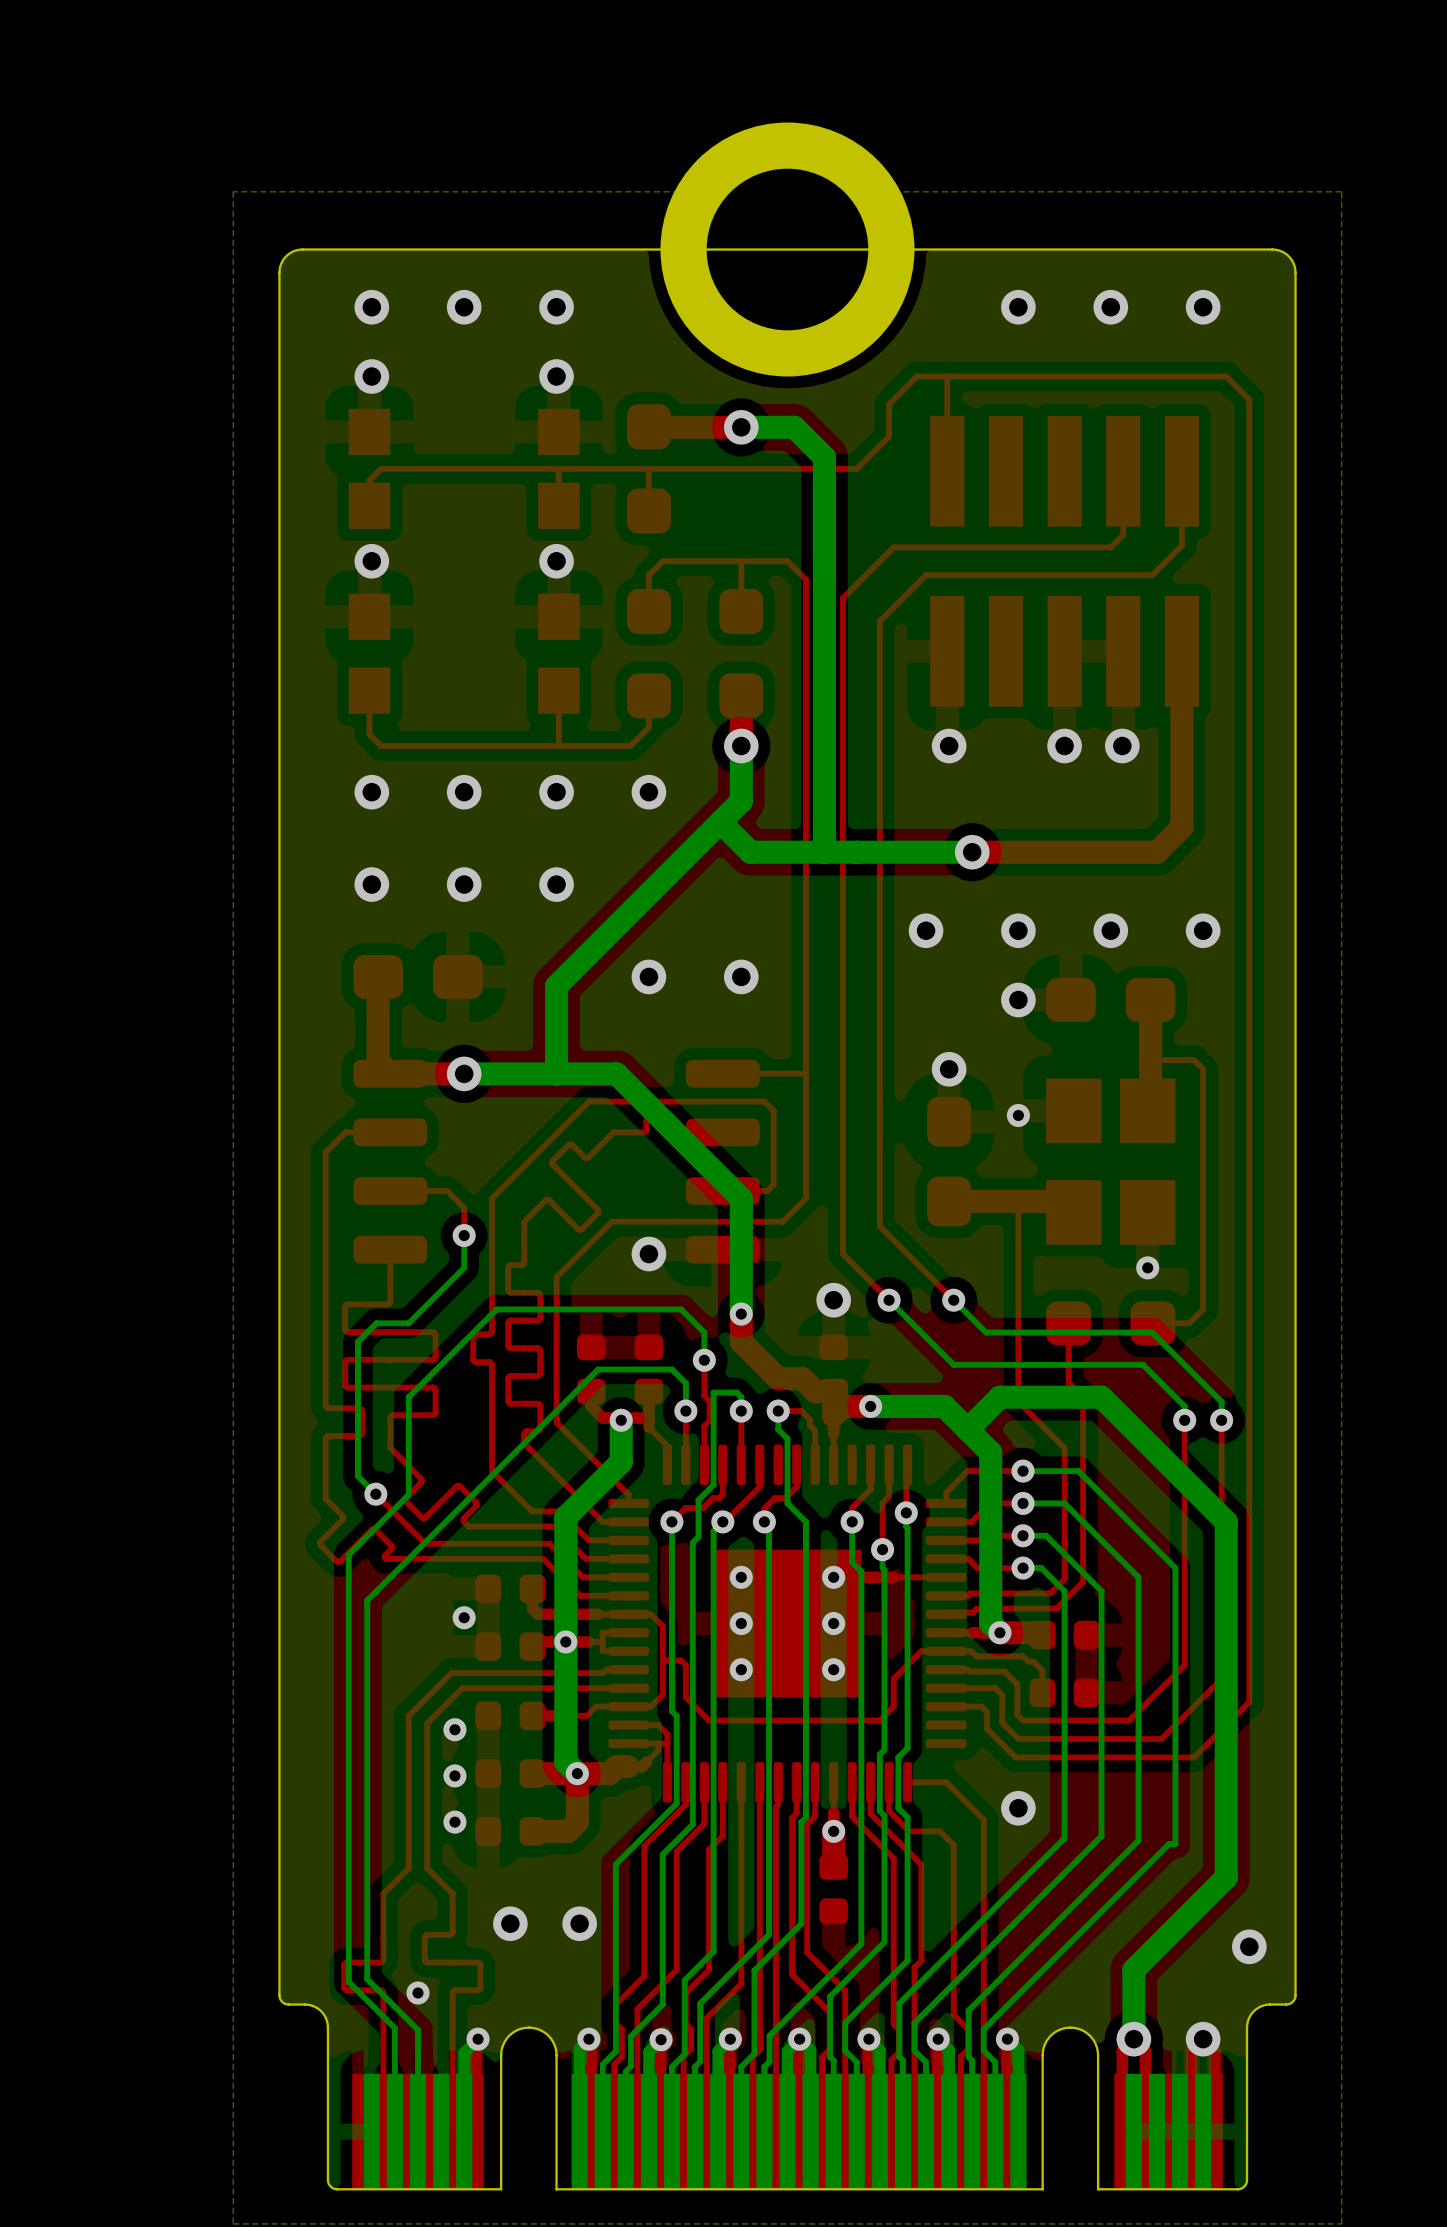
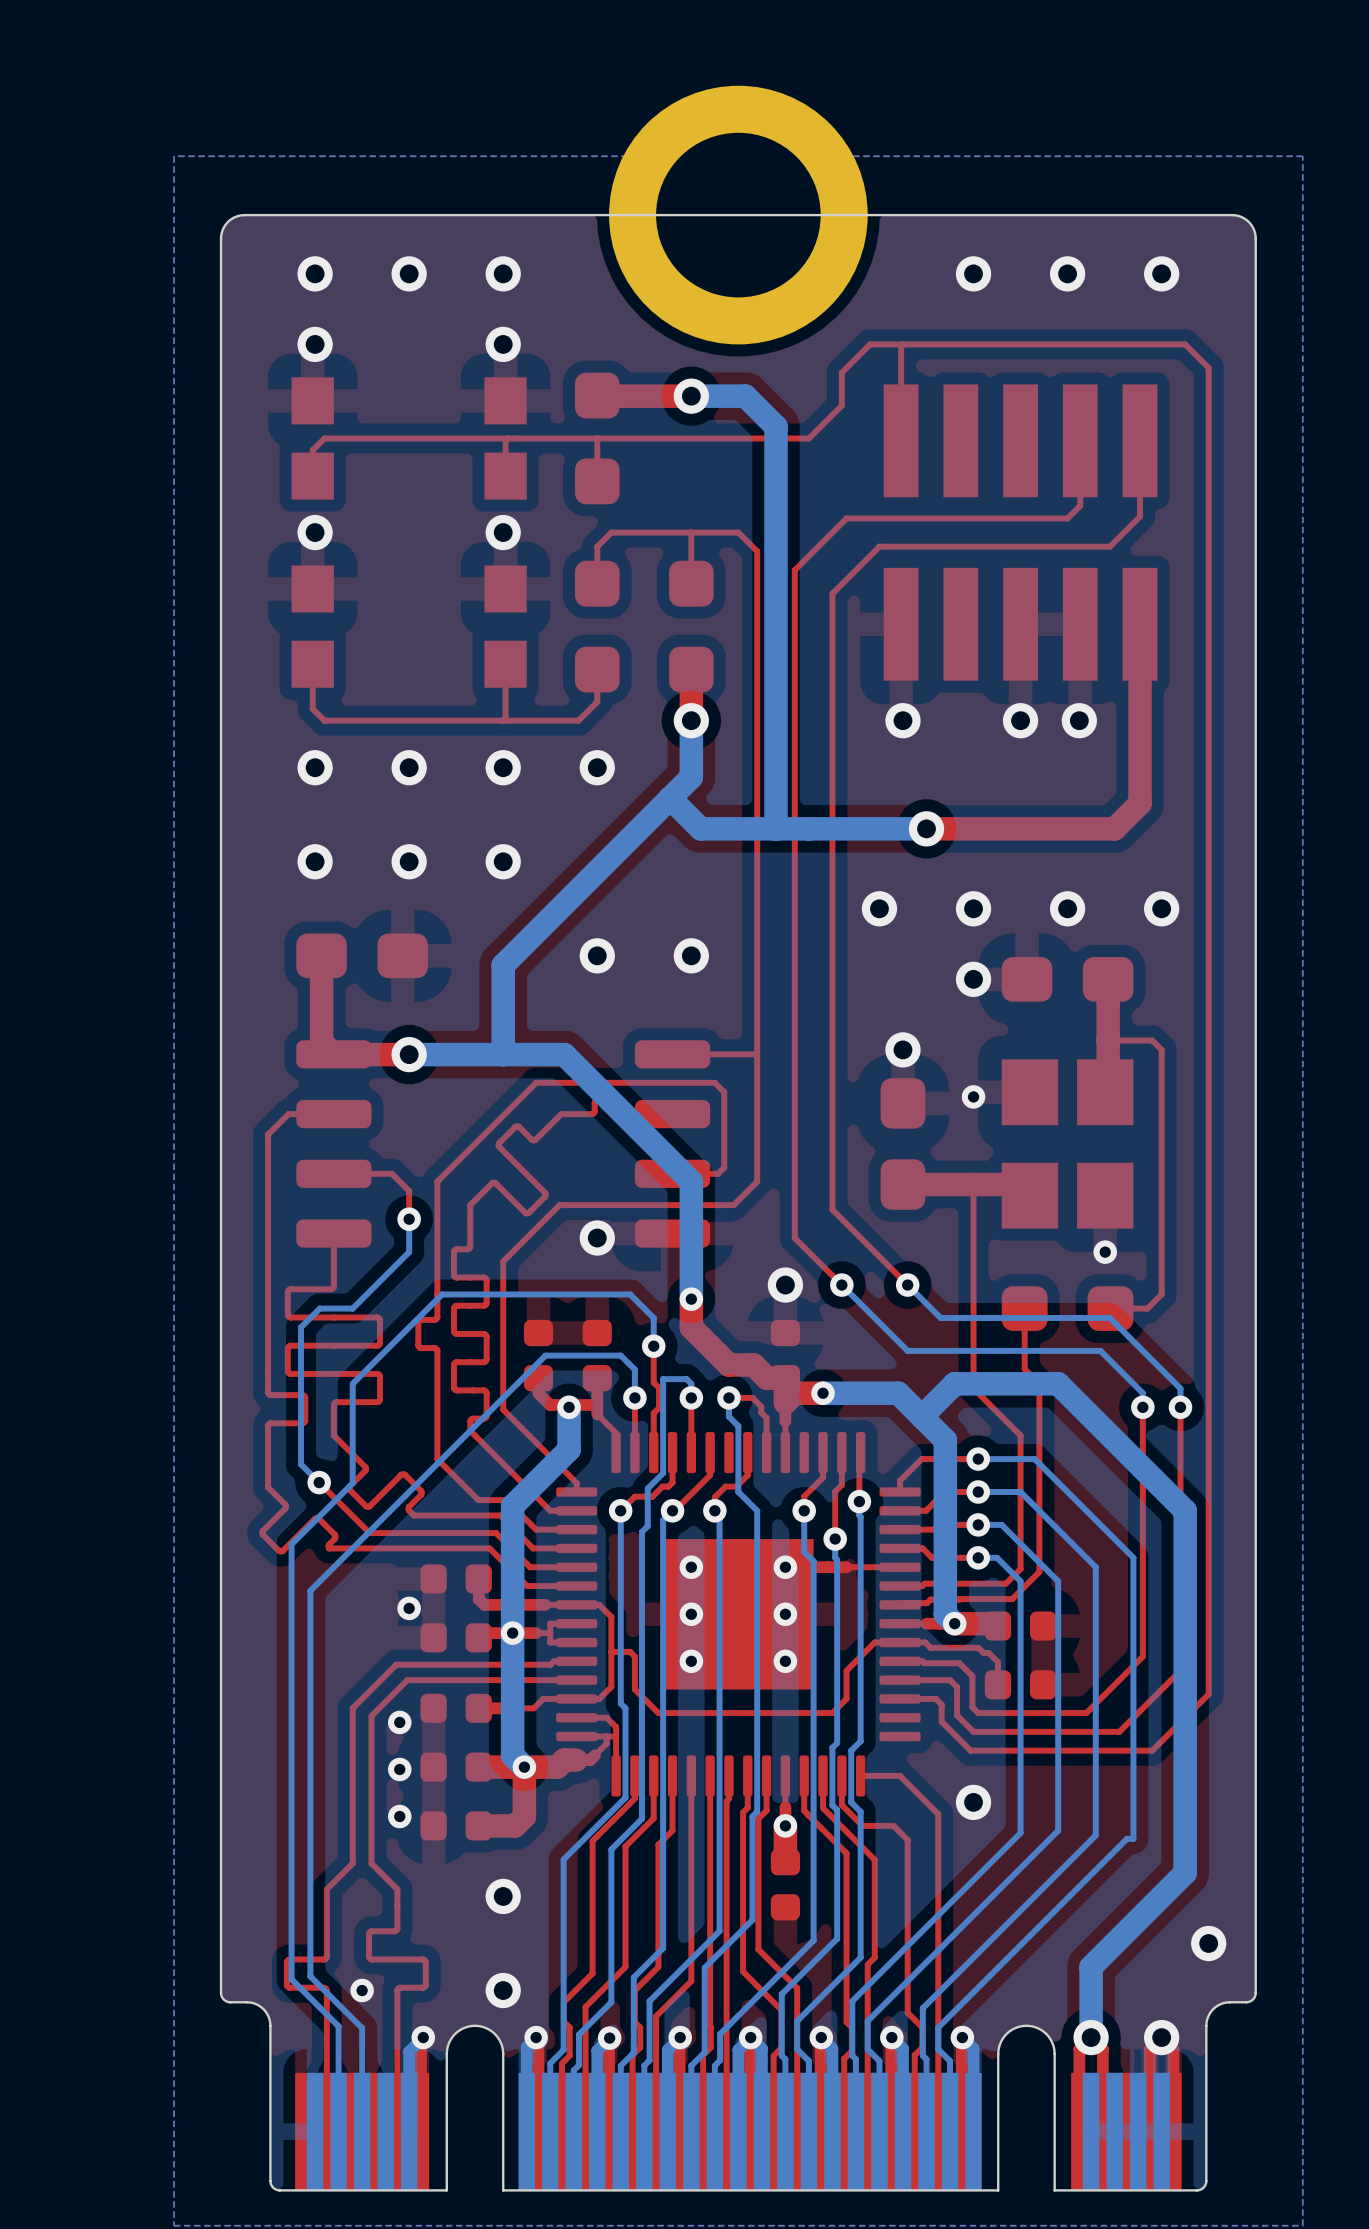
via: (510, 1923) -> none
via position: (579, 1923) -> (503, 1896)
via: none -> (503, 1990)

